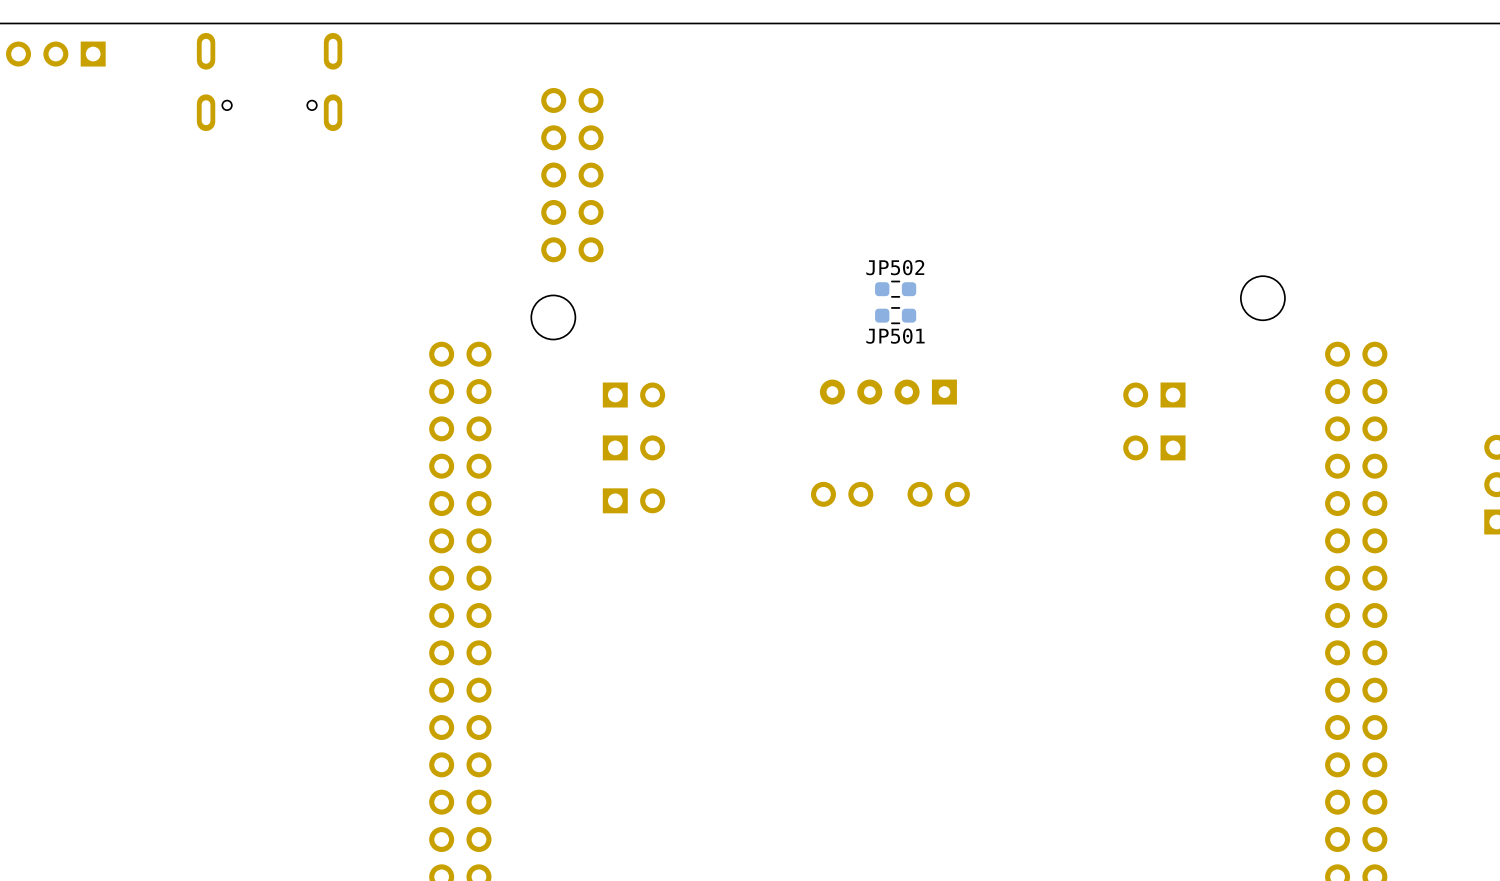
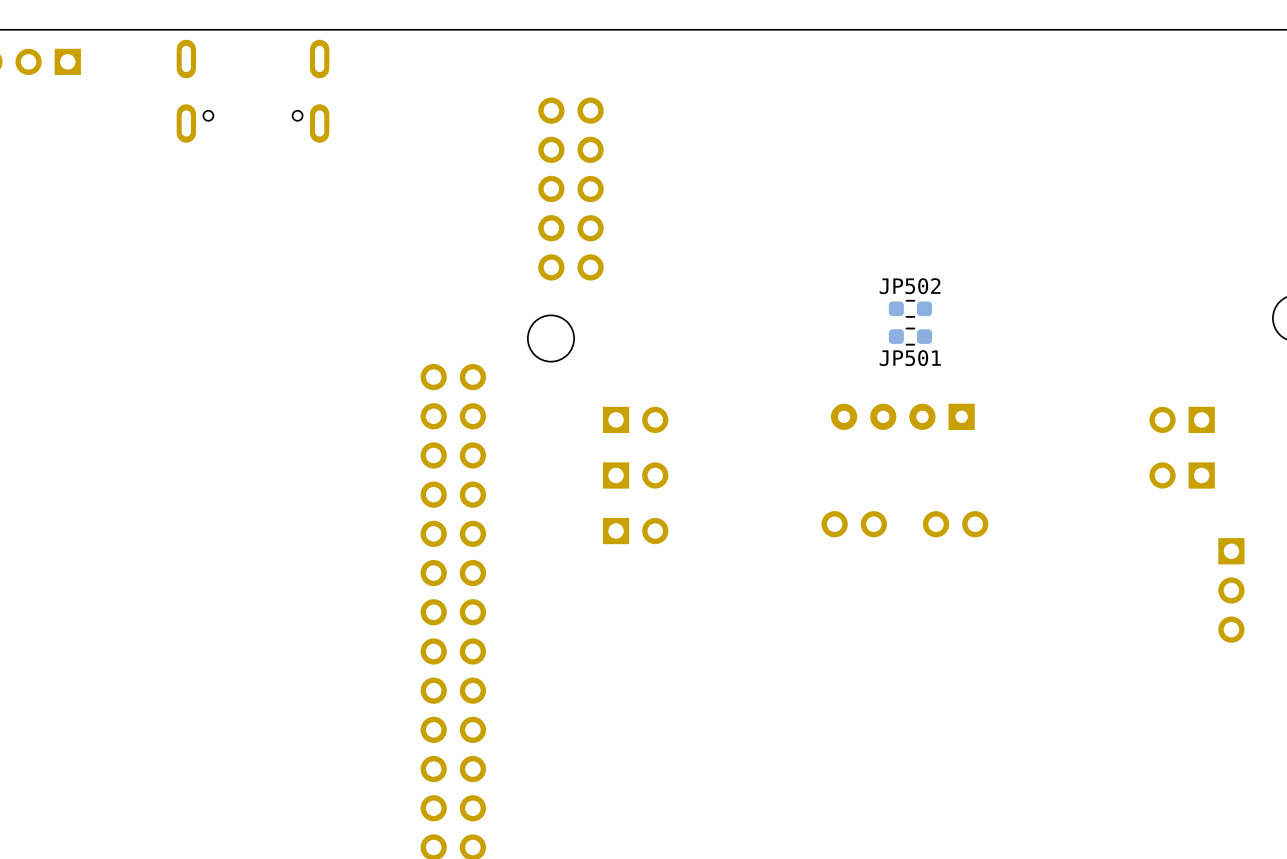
part: none -> (1231, 590)

